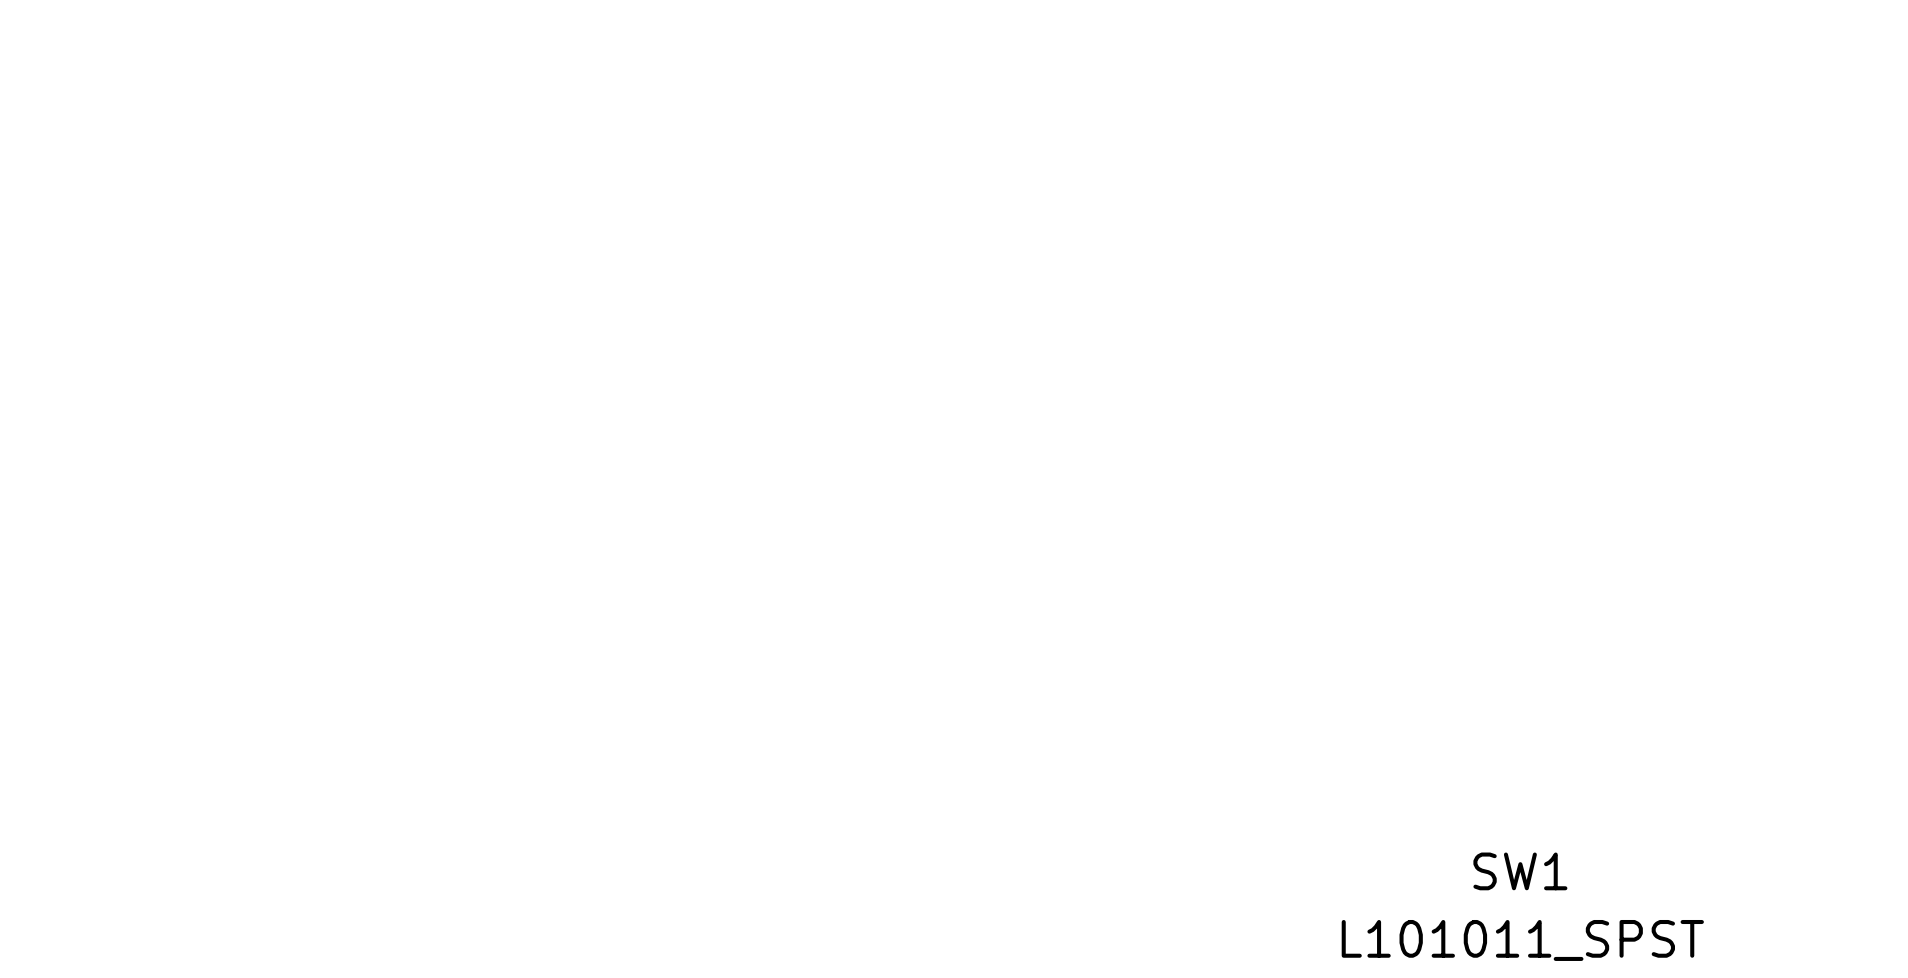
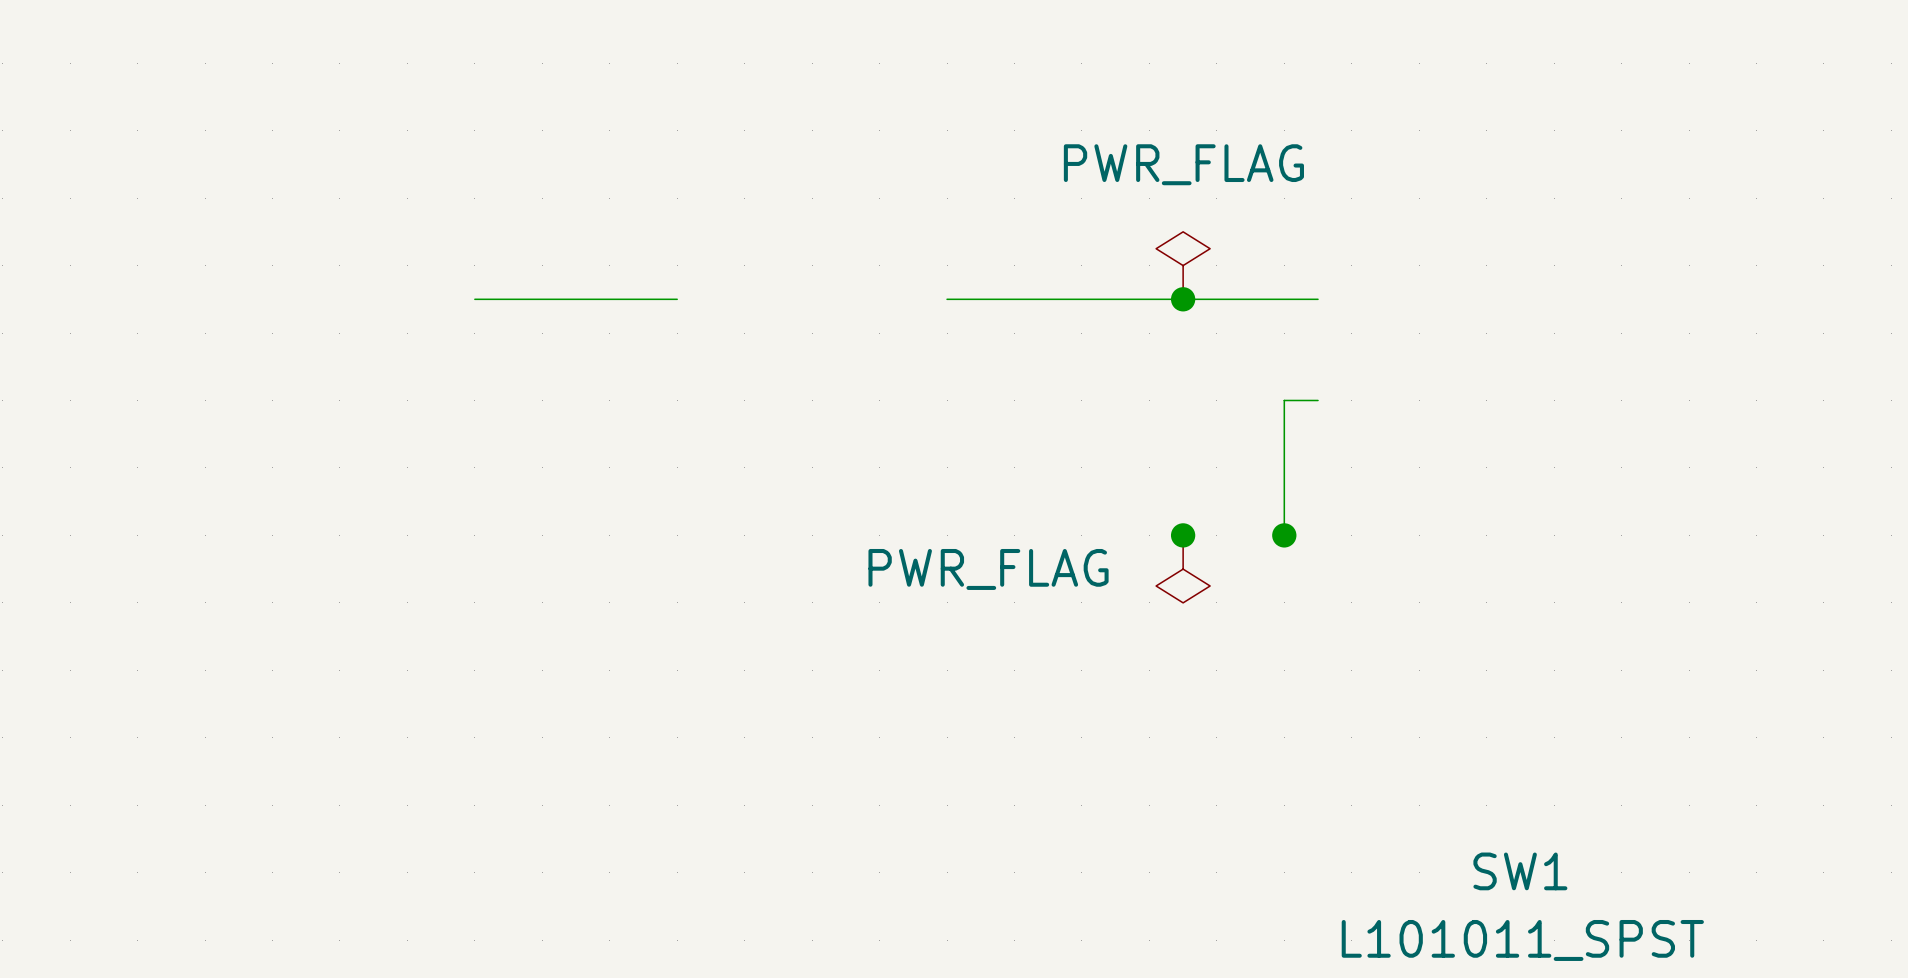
power symbol: none -> PWR_FLAG (1183, 265)
wire: none -> (474, 299) (677, 299)
wire: none -> (947, 299) (1318, 299)
junction: none -> (1183, 299)
wire: none -> (1318, 400) (1284, 400) (1284, 535)
junction: none -> (1183, 535)
junction: none -> (1284, 535)
power symbol: none -> PWR_FLAG (1183, 569)

